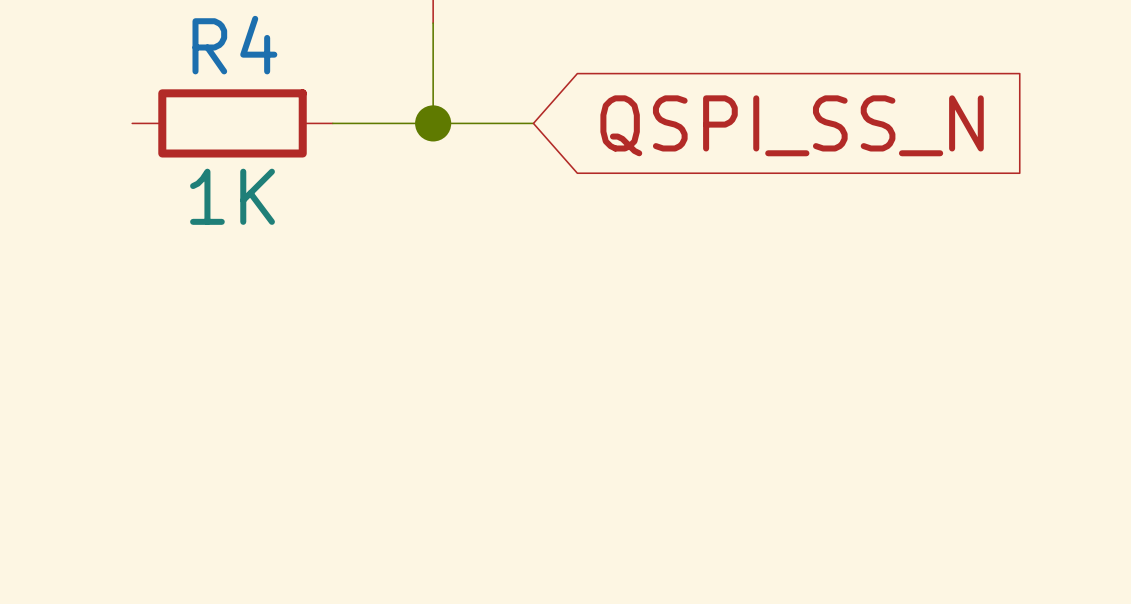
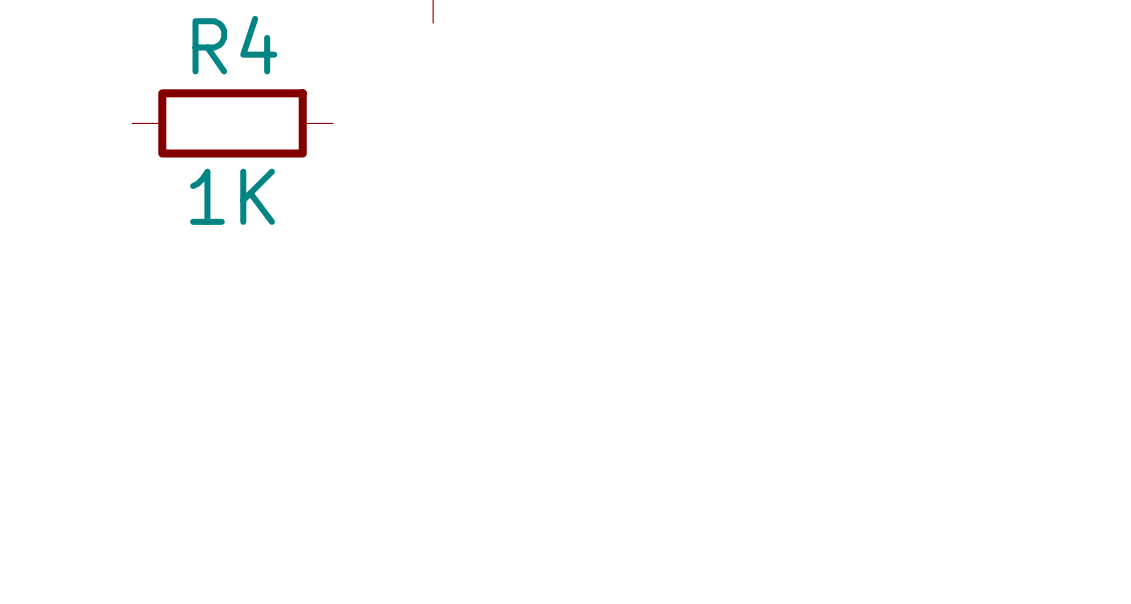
wire: (433, 23) (433, 123) -> none
wire: (332, 123) (533, 123) -> none
junction: (433, 123) -> none
global label: QSPI_SS_N (792, 125) -> none

